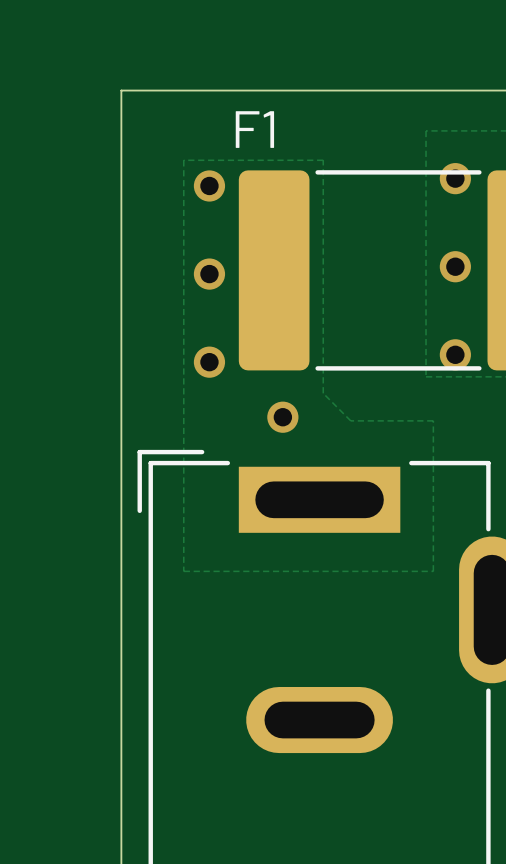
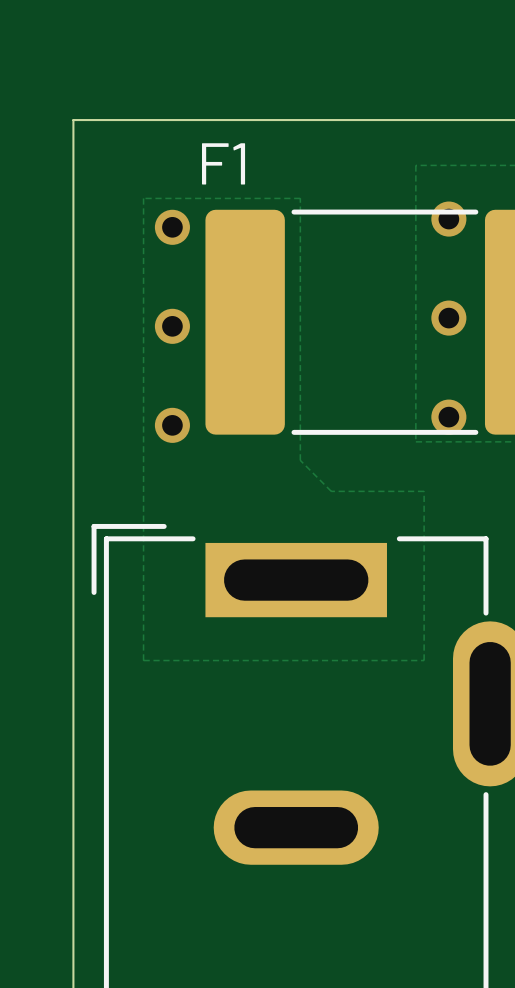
via: (282, 417) -> none

